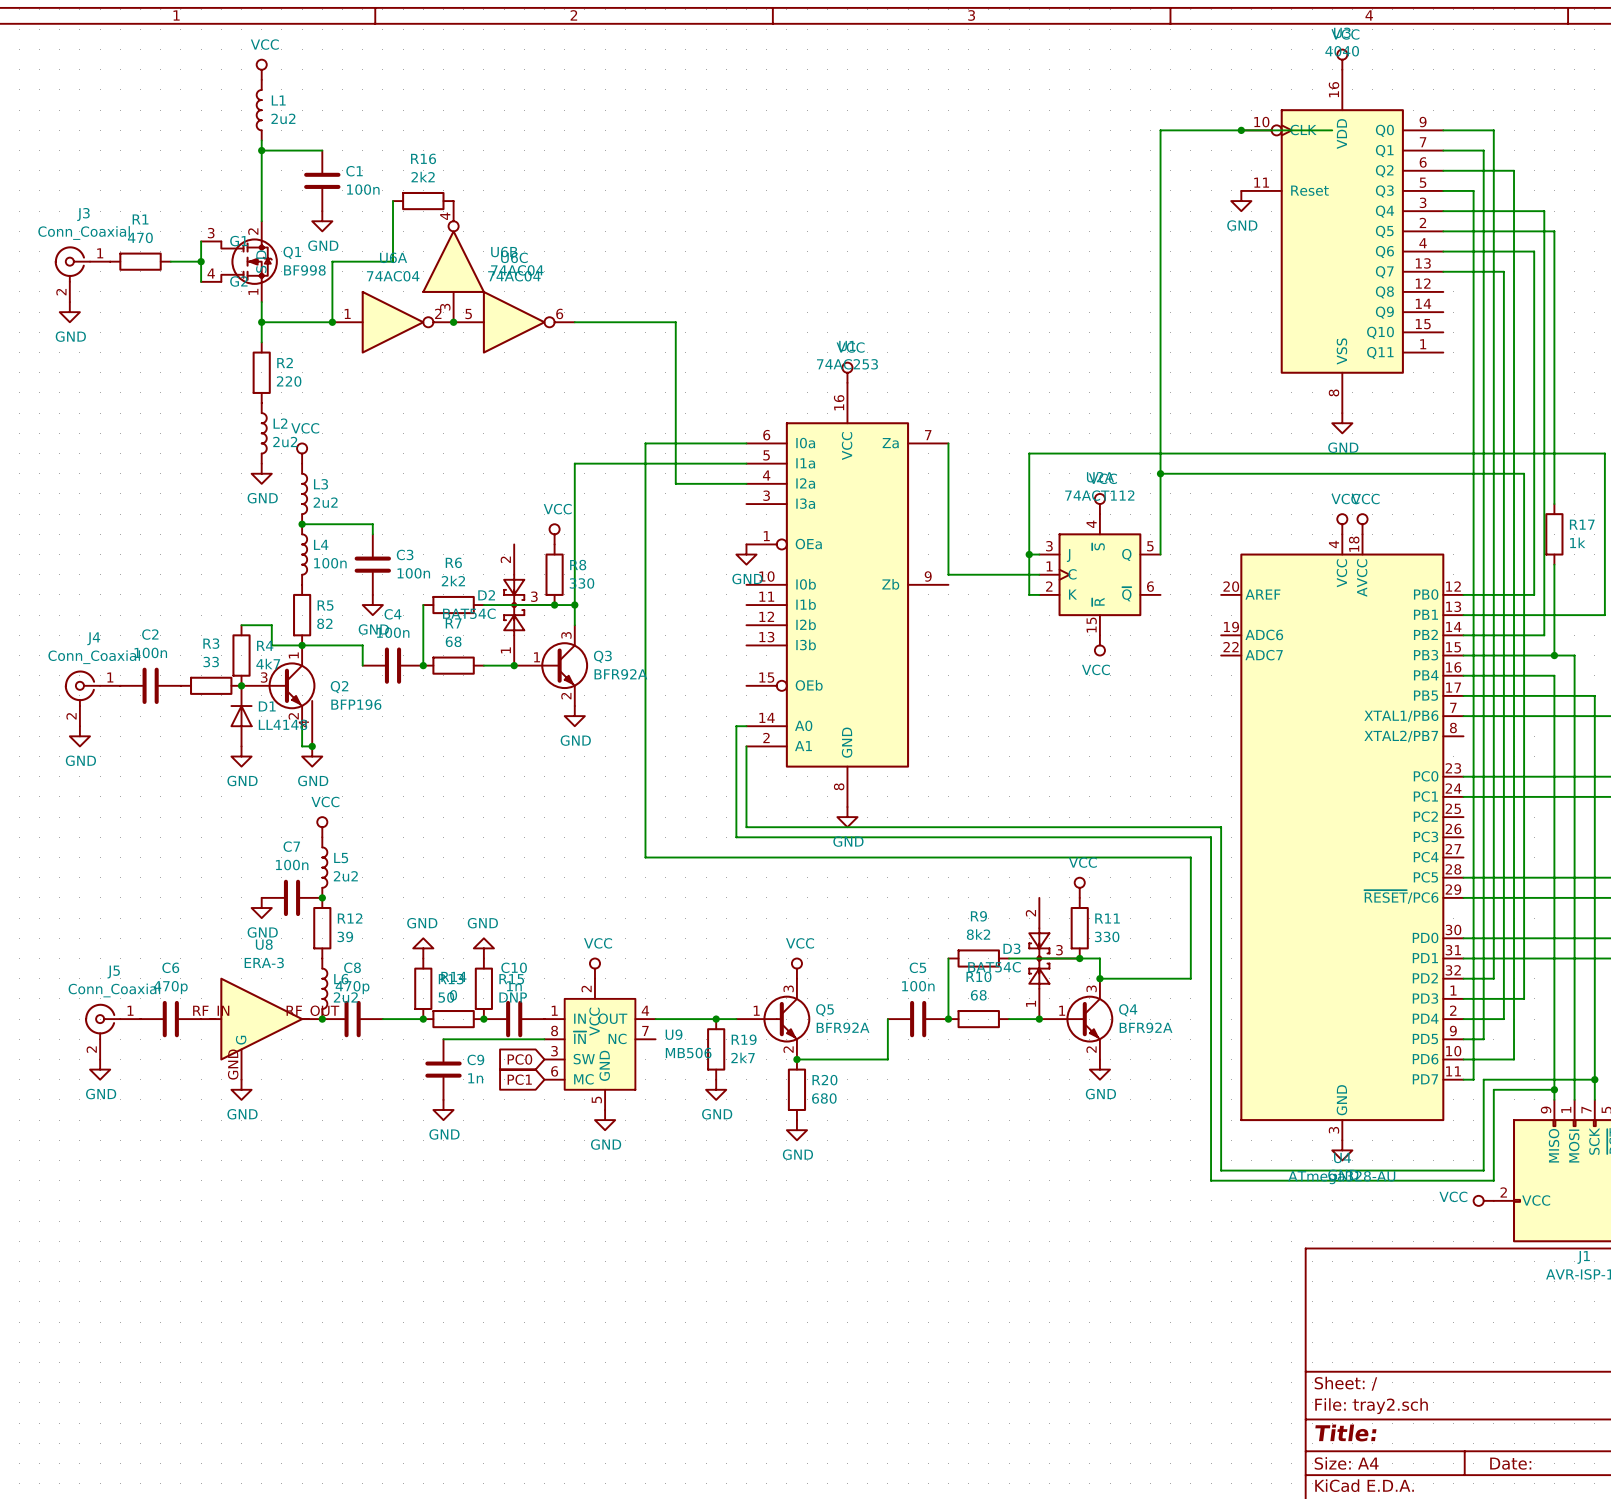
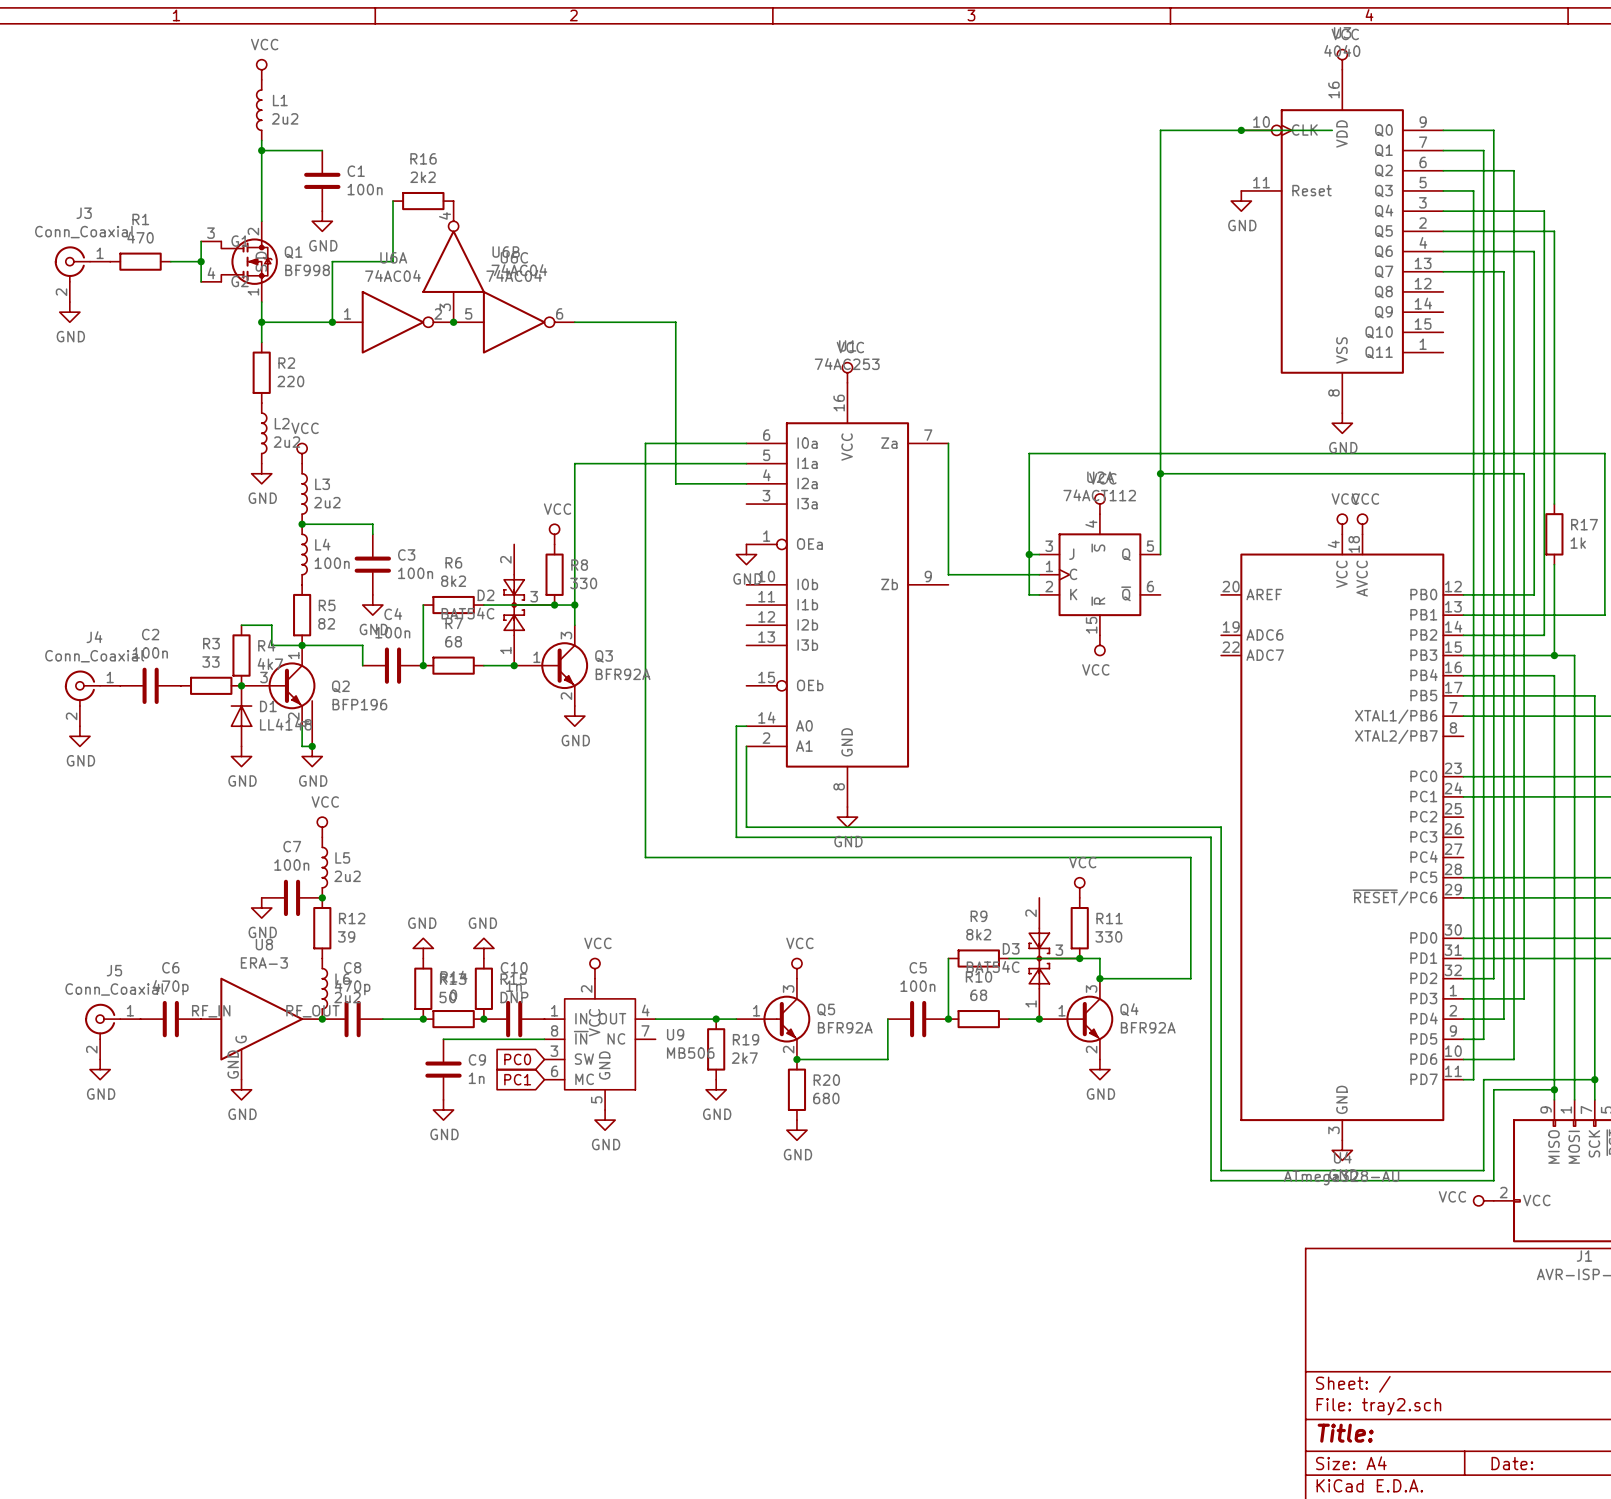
R6 value: 2k2 (453, 581) -> 8k2 (453, 581)

